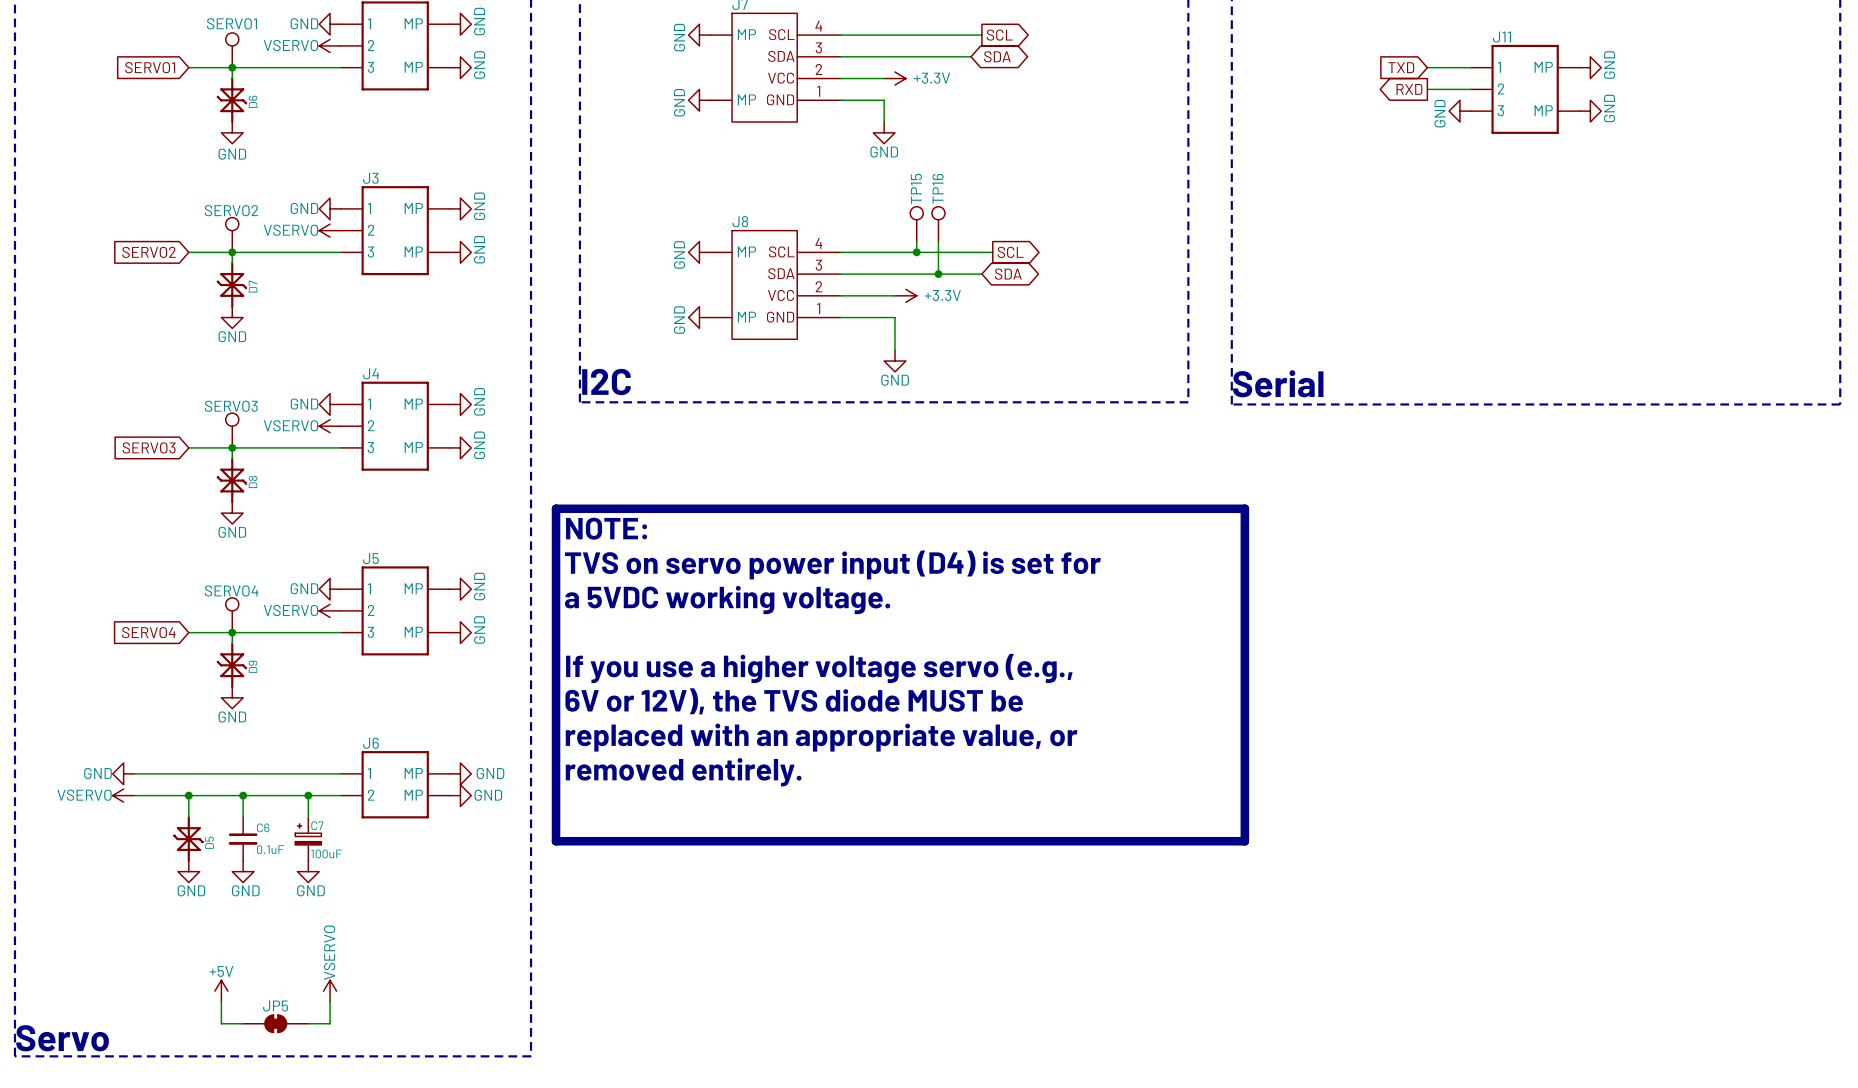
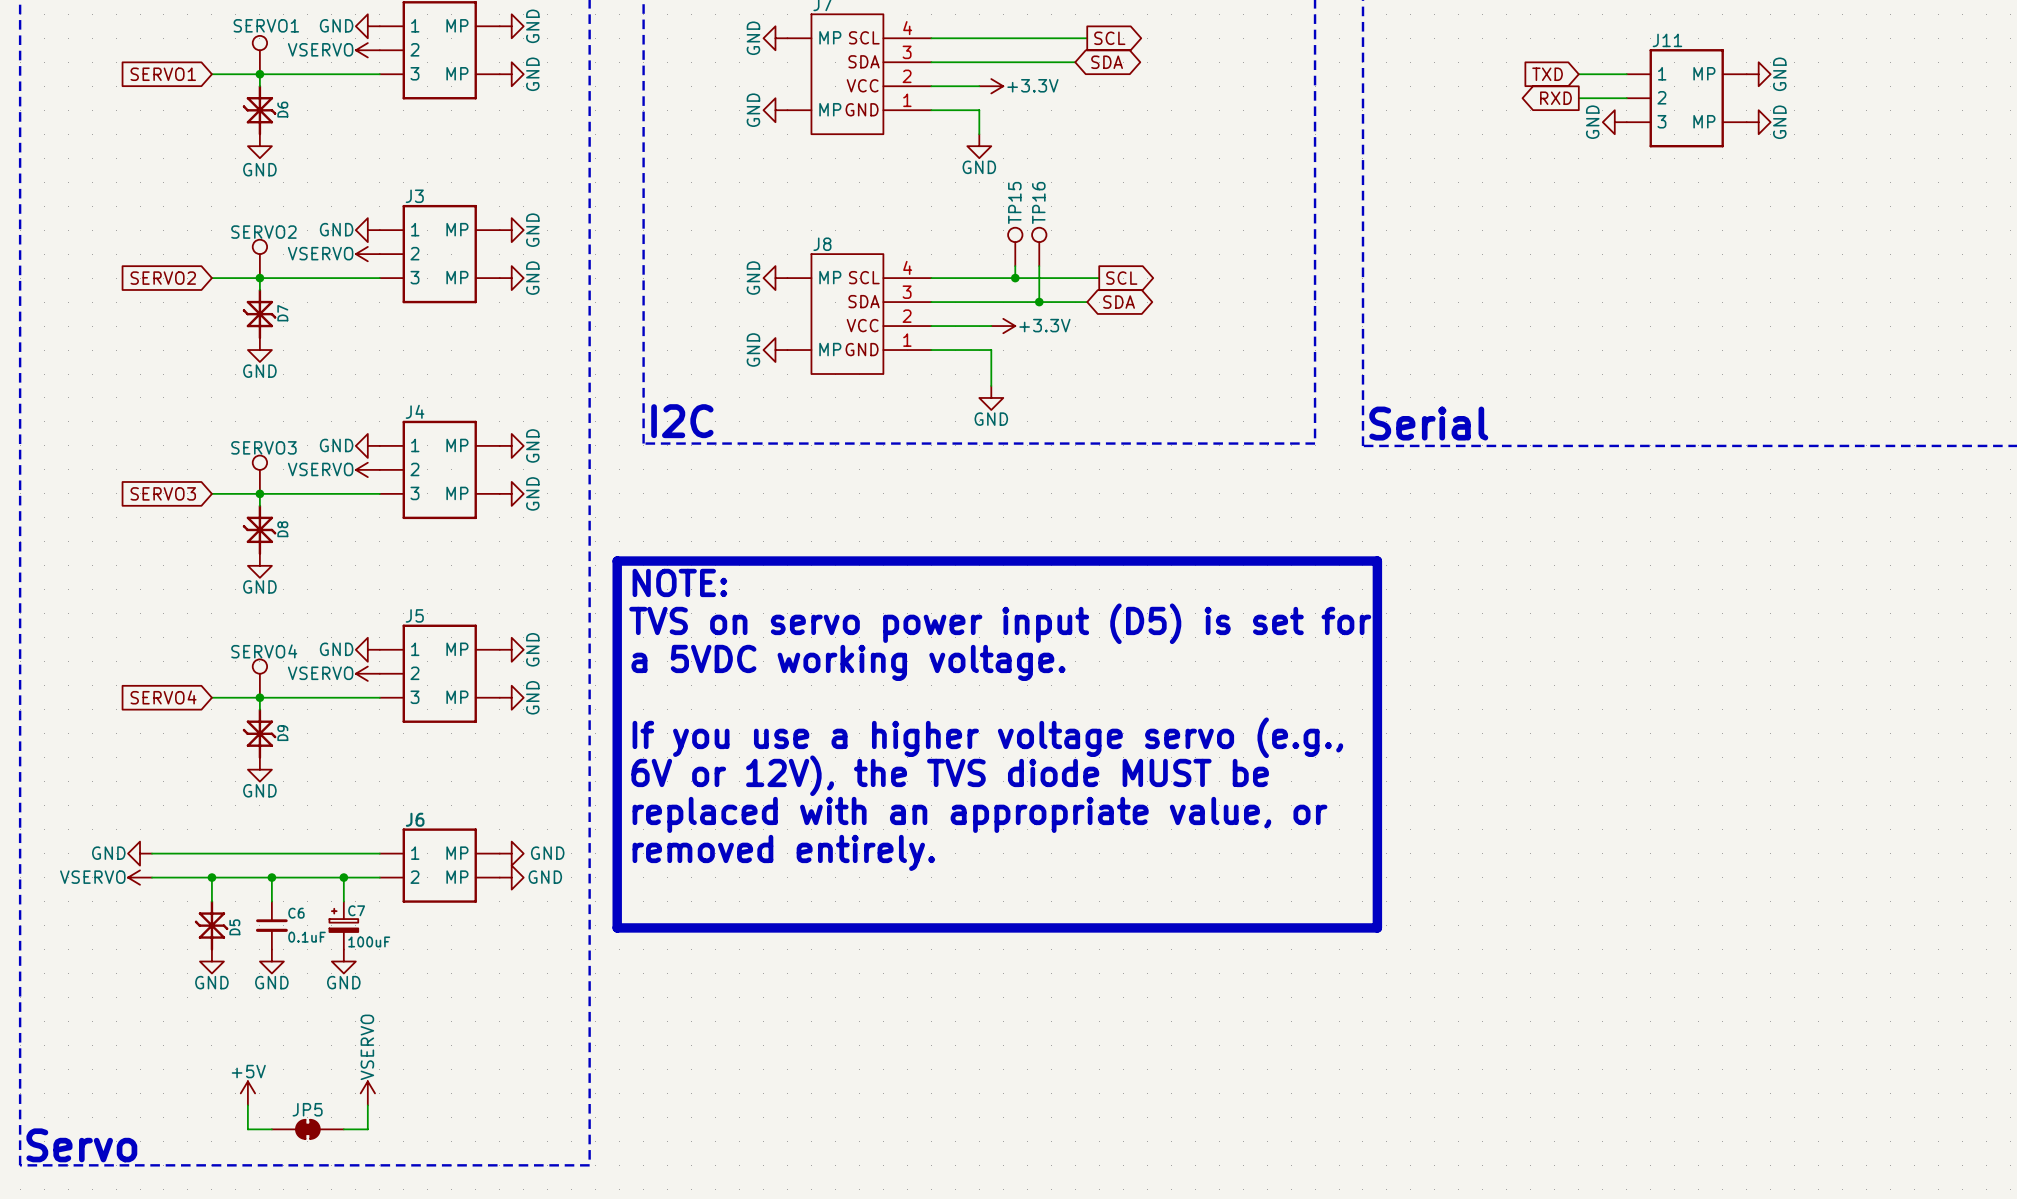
text: TVS on servo power input (D4) is set for (832, 565) -> TVS on servo power input (D5) is set for (1000, 623)

